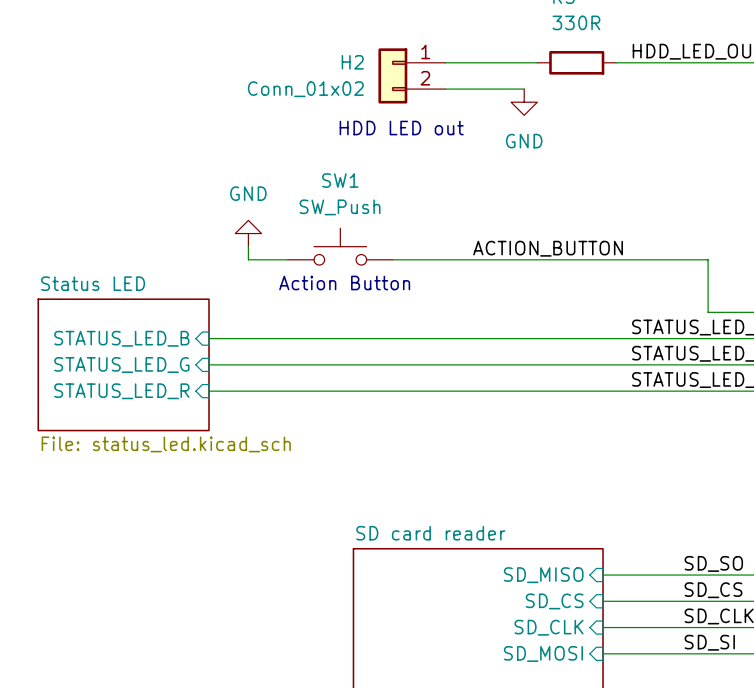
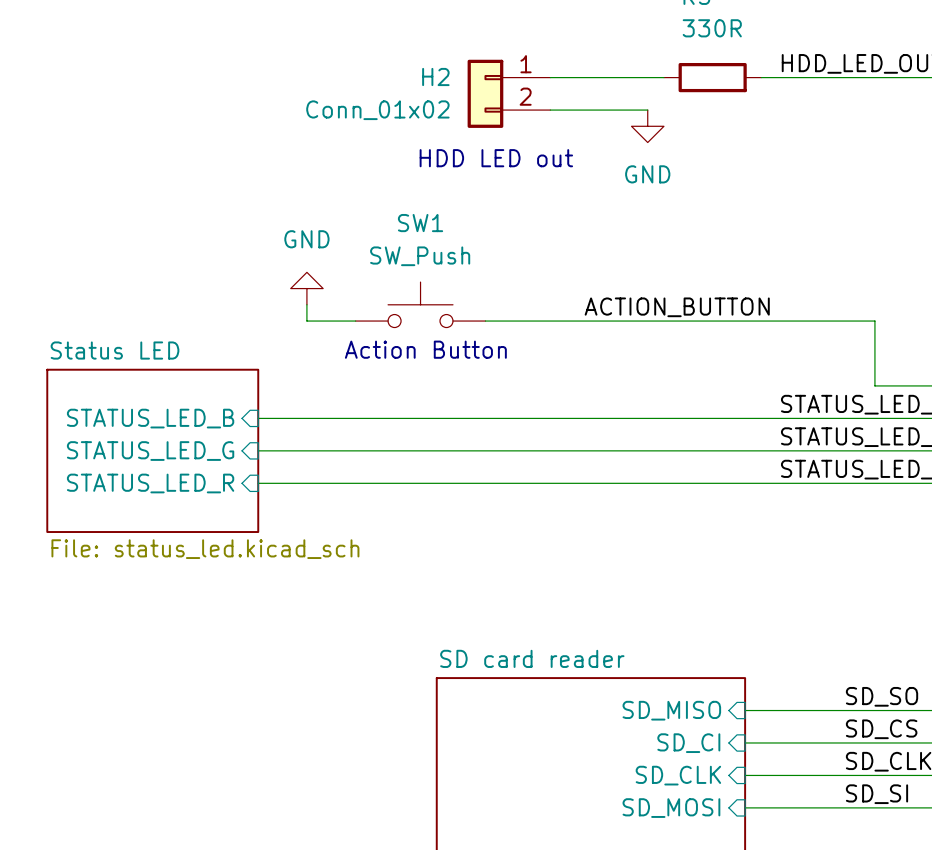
sheet pin: SD_CS (554, 601) -> SD_CI (688, 743)

